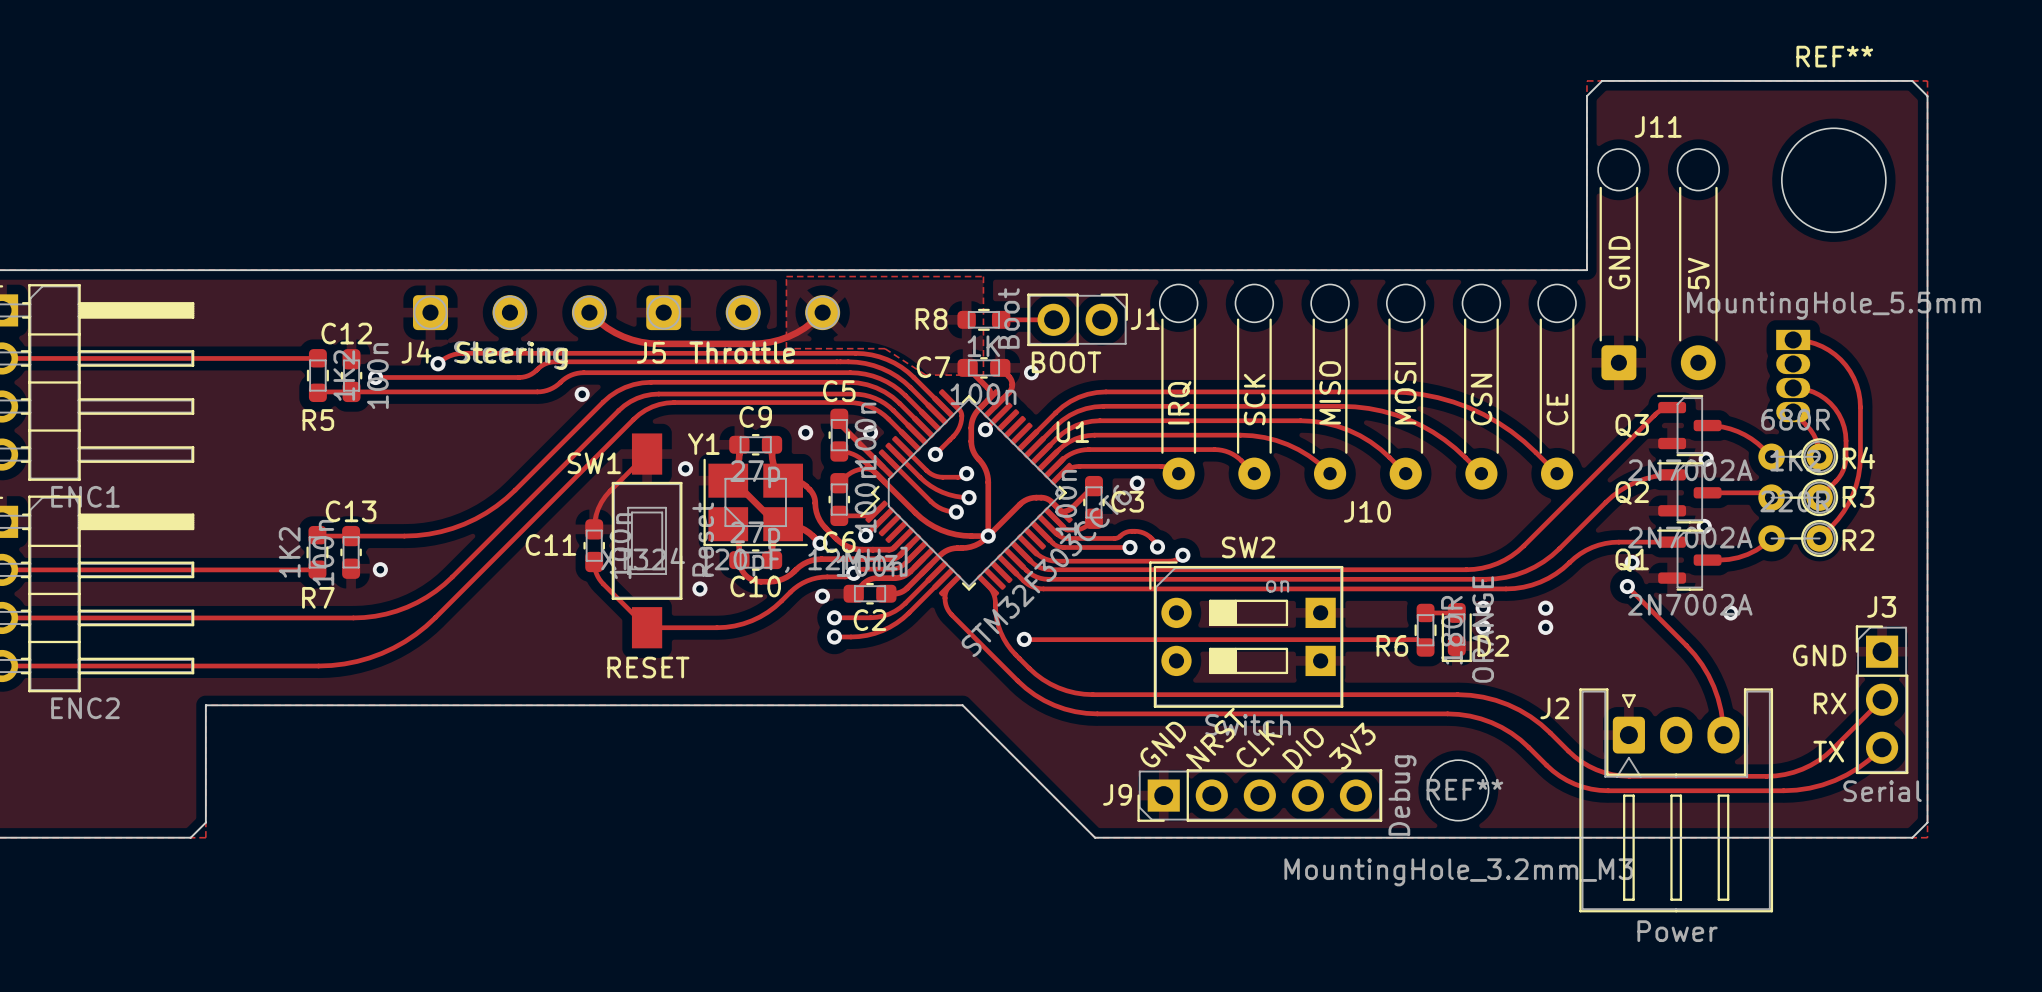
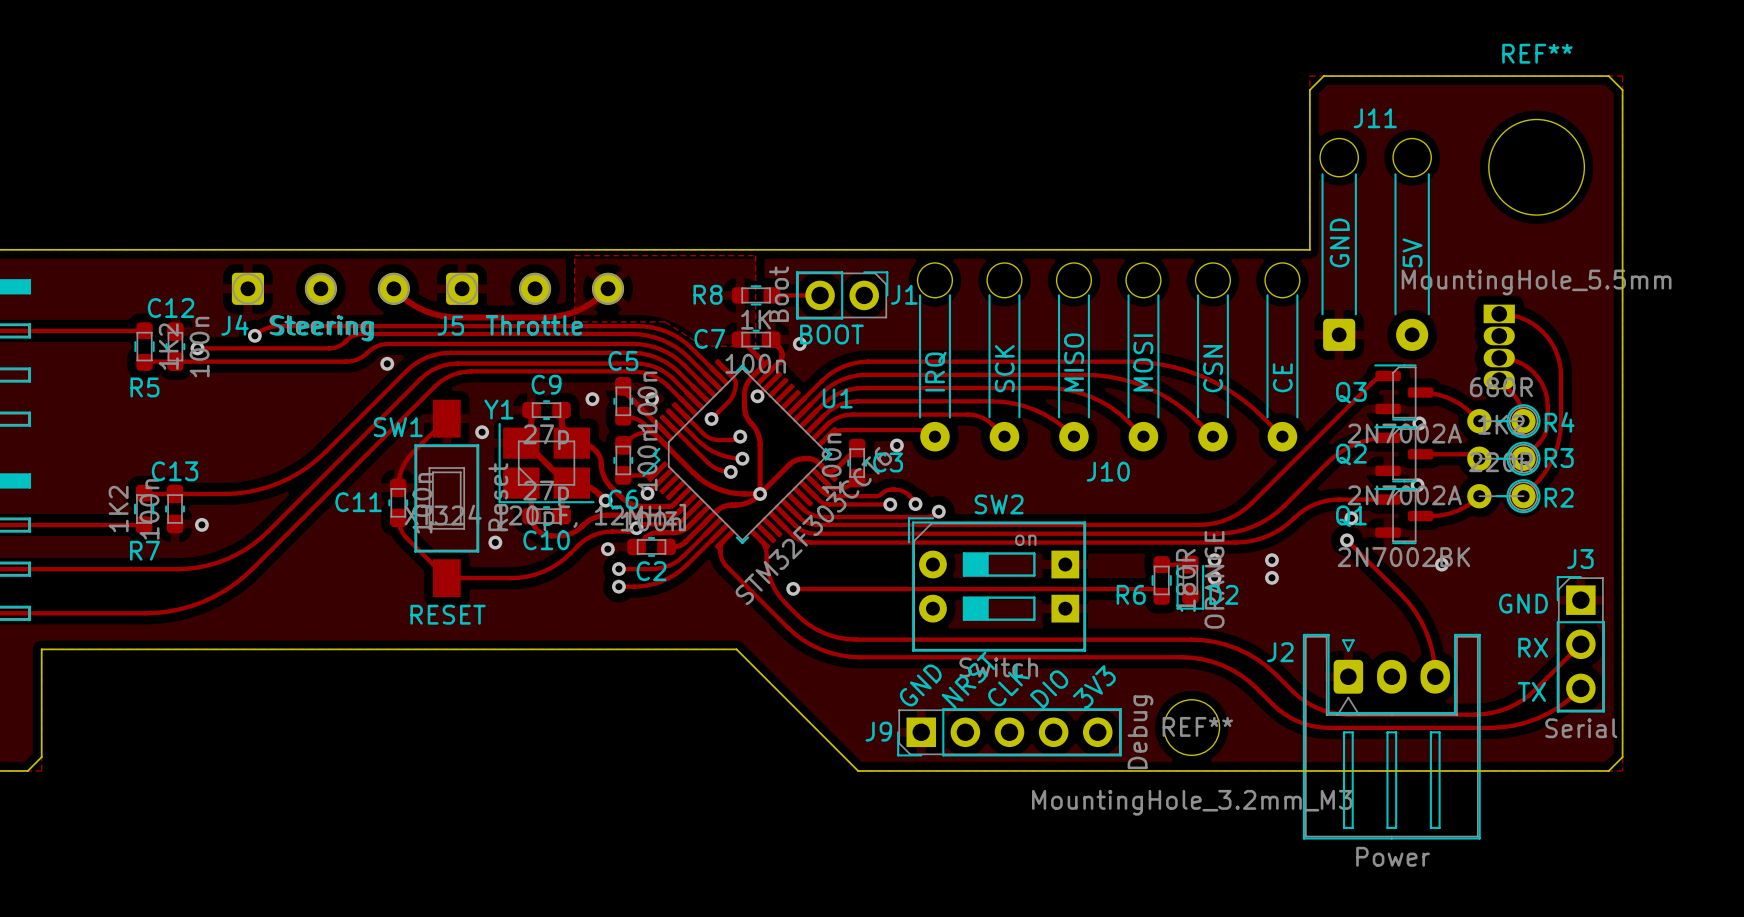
Q1 value: 2N7002A (1690, 604) -> 2N7002BK (1403, 557)

